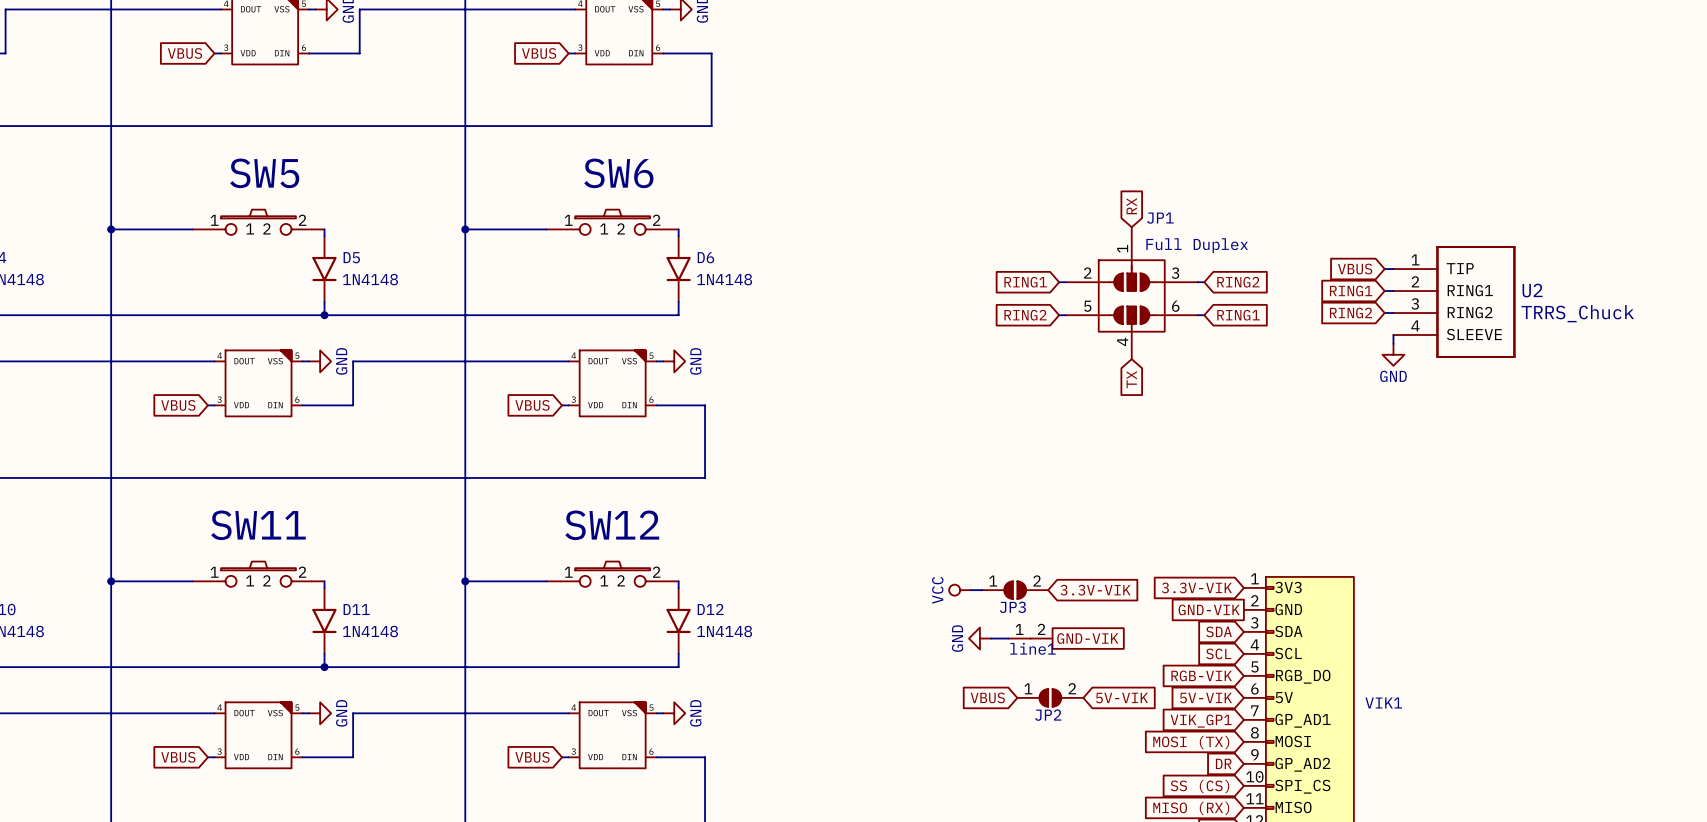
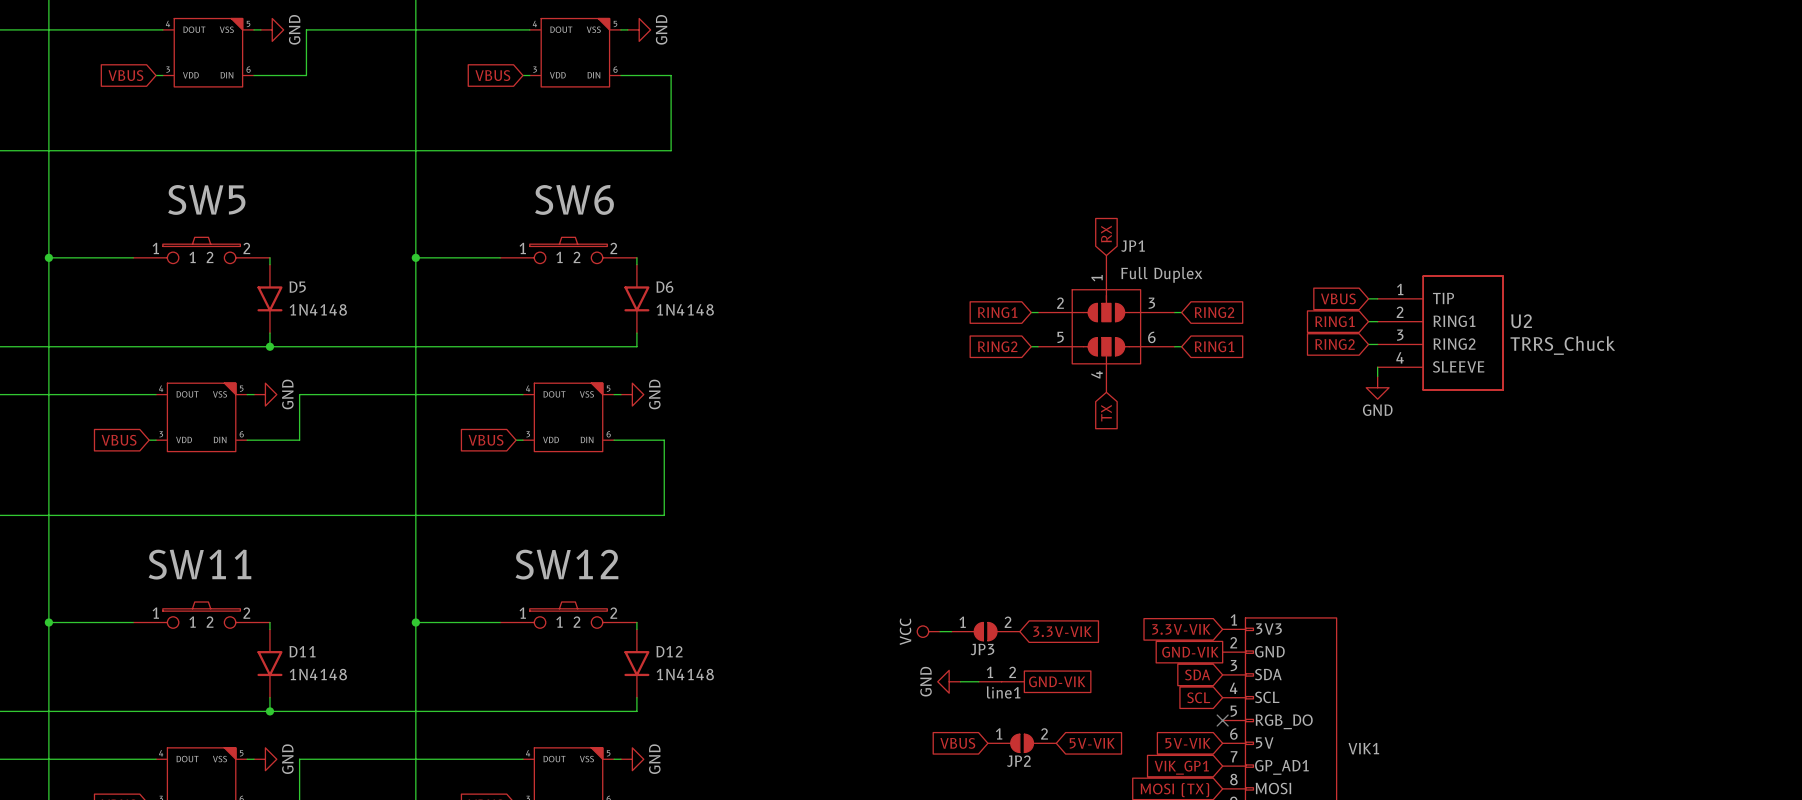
global label: RGB-VIK (1201, 675) -> none
no-connect mark: none -> (1222, 720)

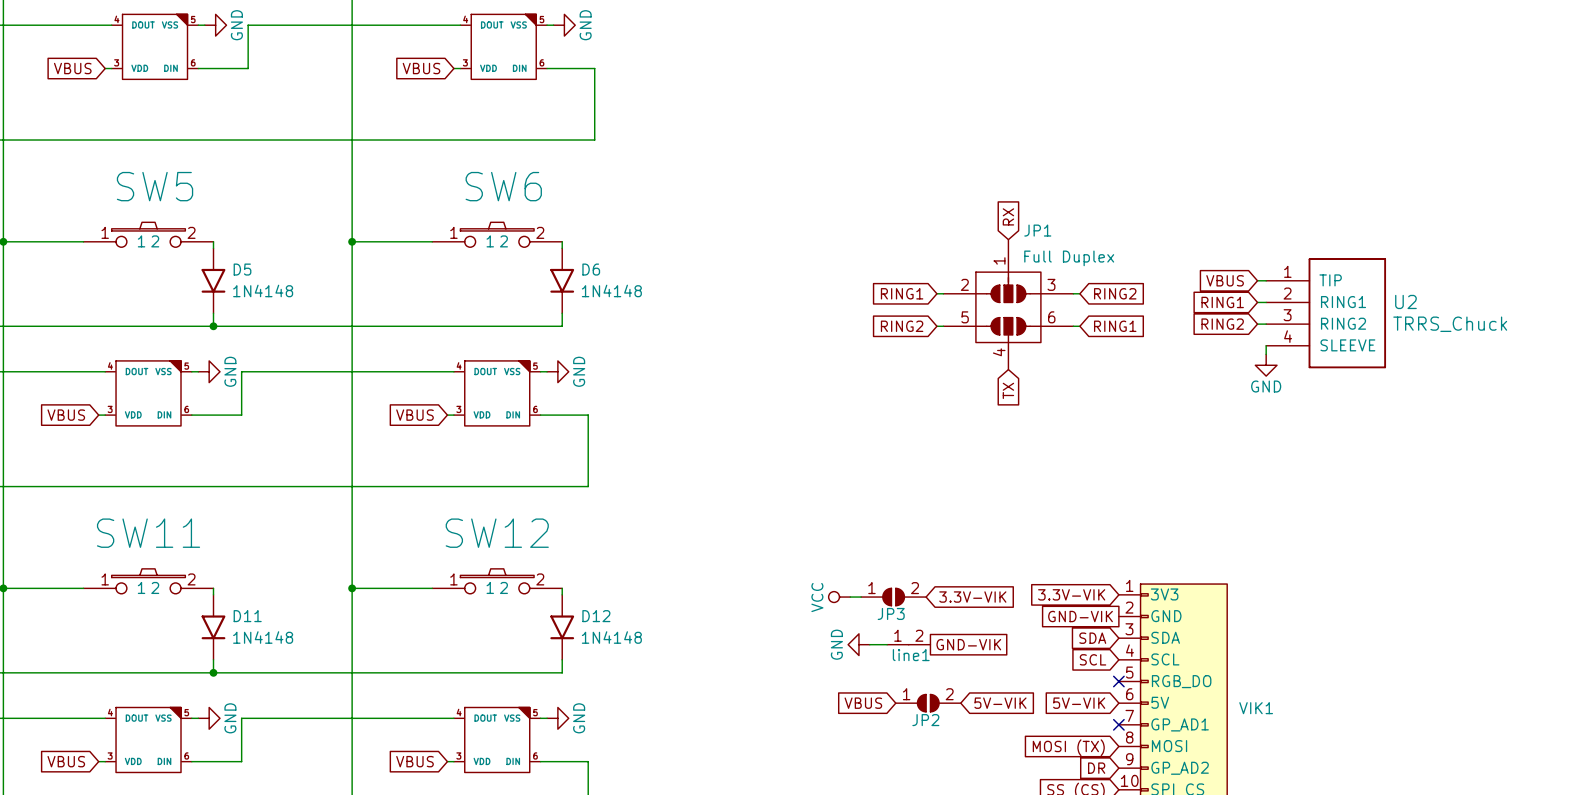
no-connect mark: none -> (1118, 724)
global label: VIK_GP1 (1181, 767) -> none

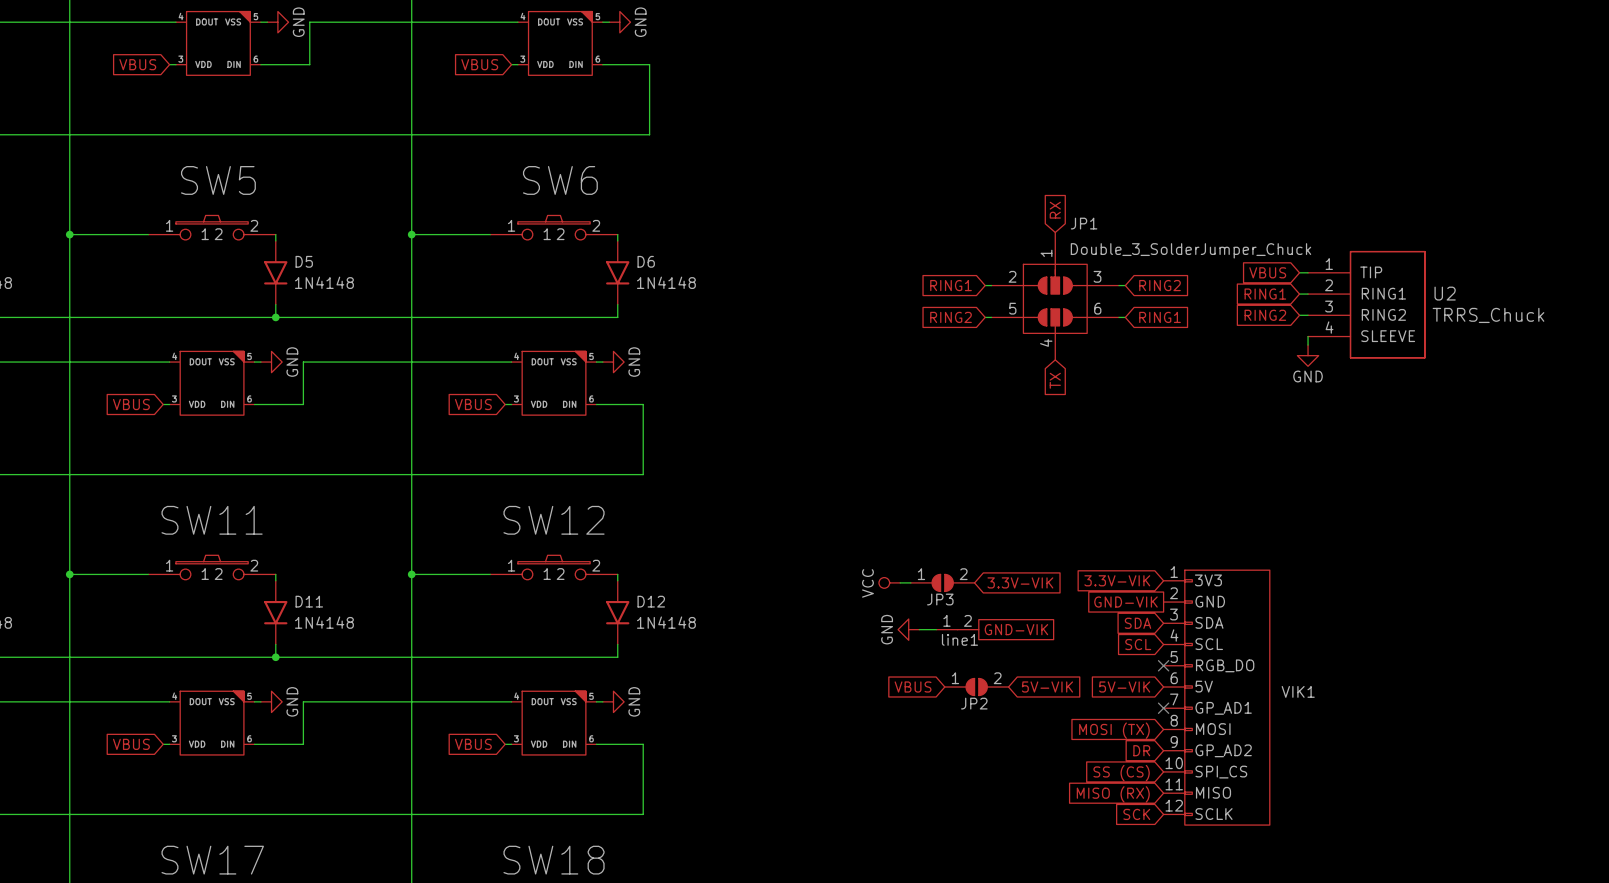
JP1 value: Full Duplex (1069, 258) -> Double_3_SolderJumper_Chuck (1190, 250)

